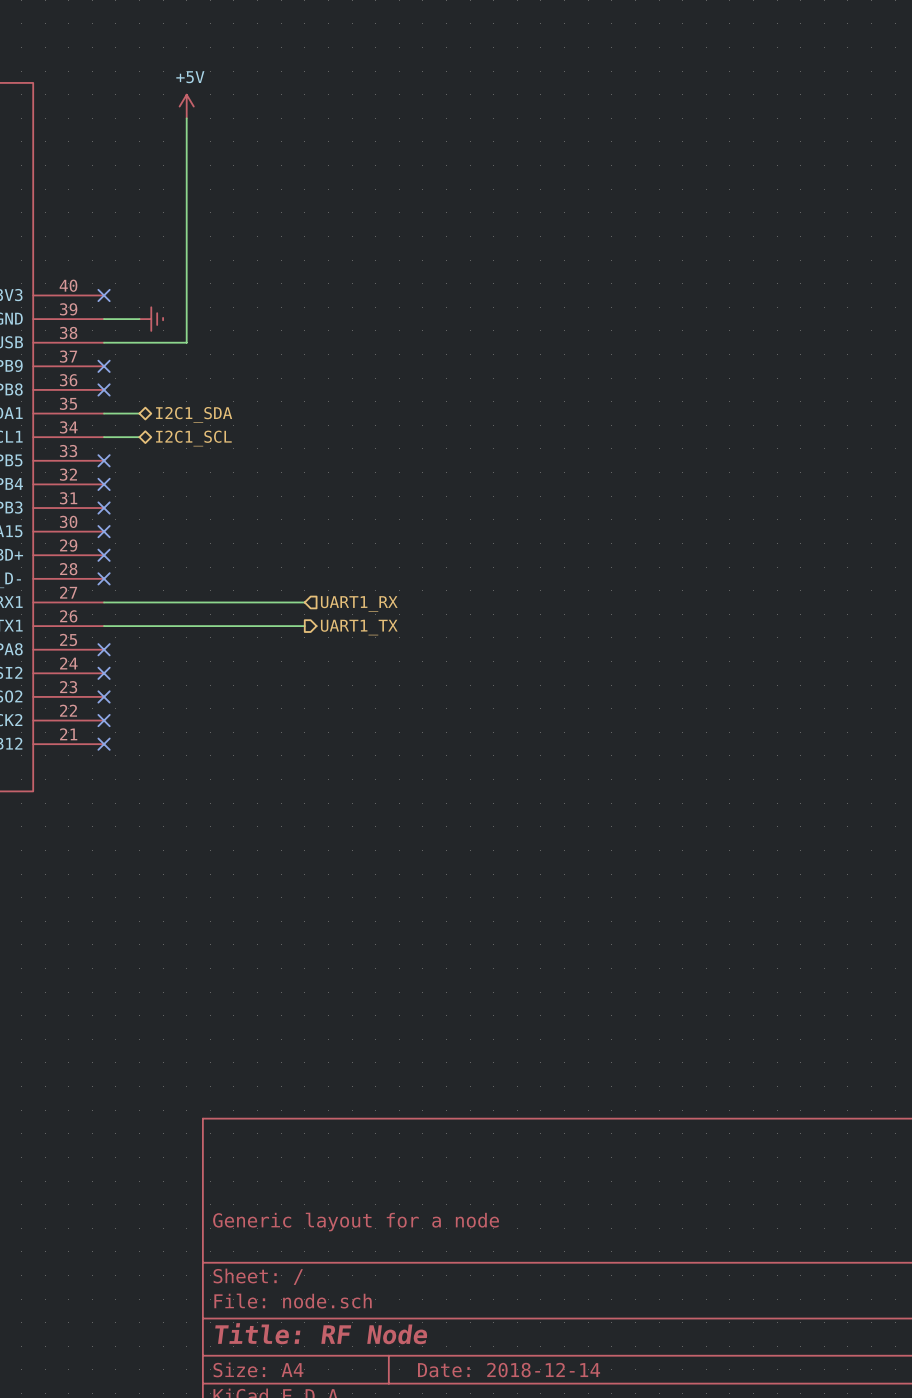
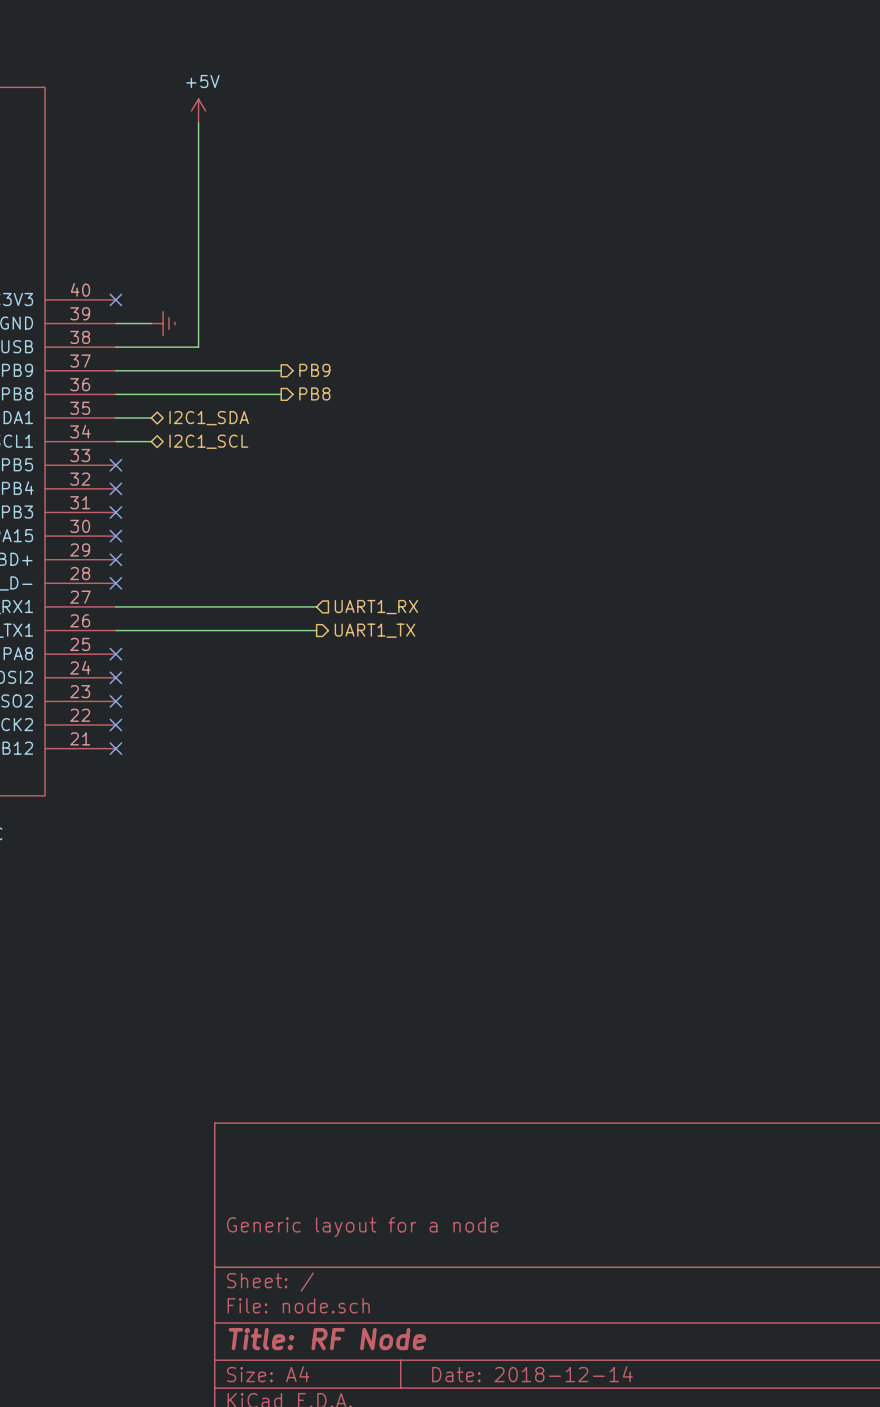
hierarchical label: none -> PB9 (314, 370)
wire: none -> (115, 370) (281, 370)
no-connect mark: (104, 366) -> none
wire: none -> (115, 394) (281, 394)
no-connect mark: (104, 389) -> none
hierarchical label: none -> PB8 (314, 393)

